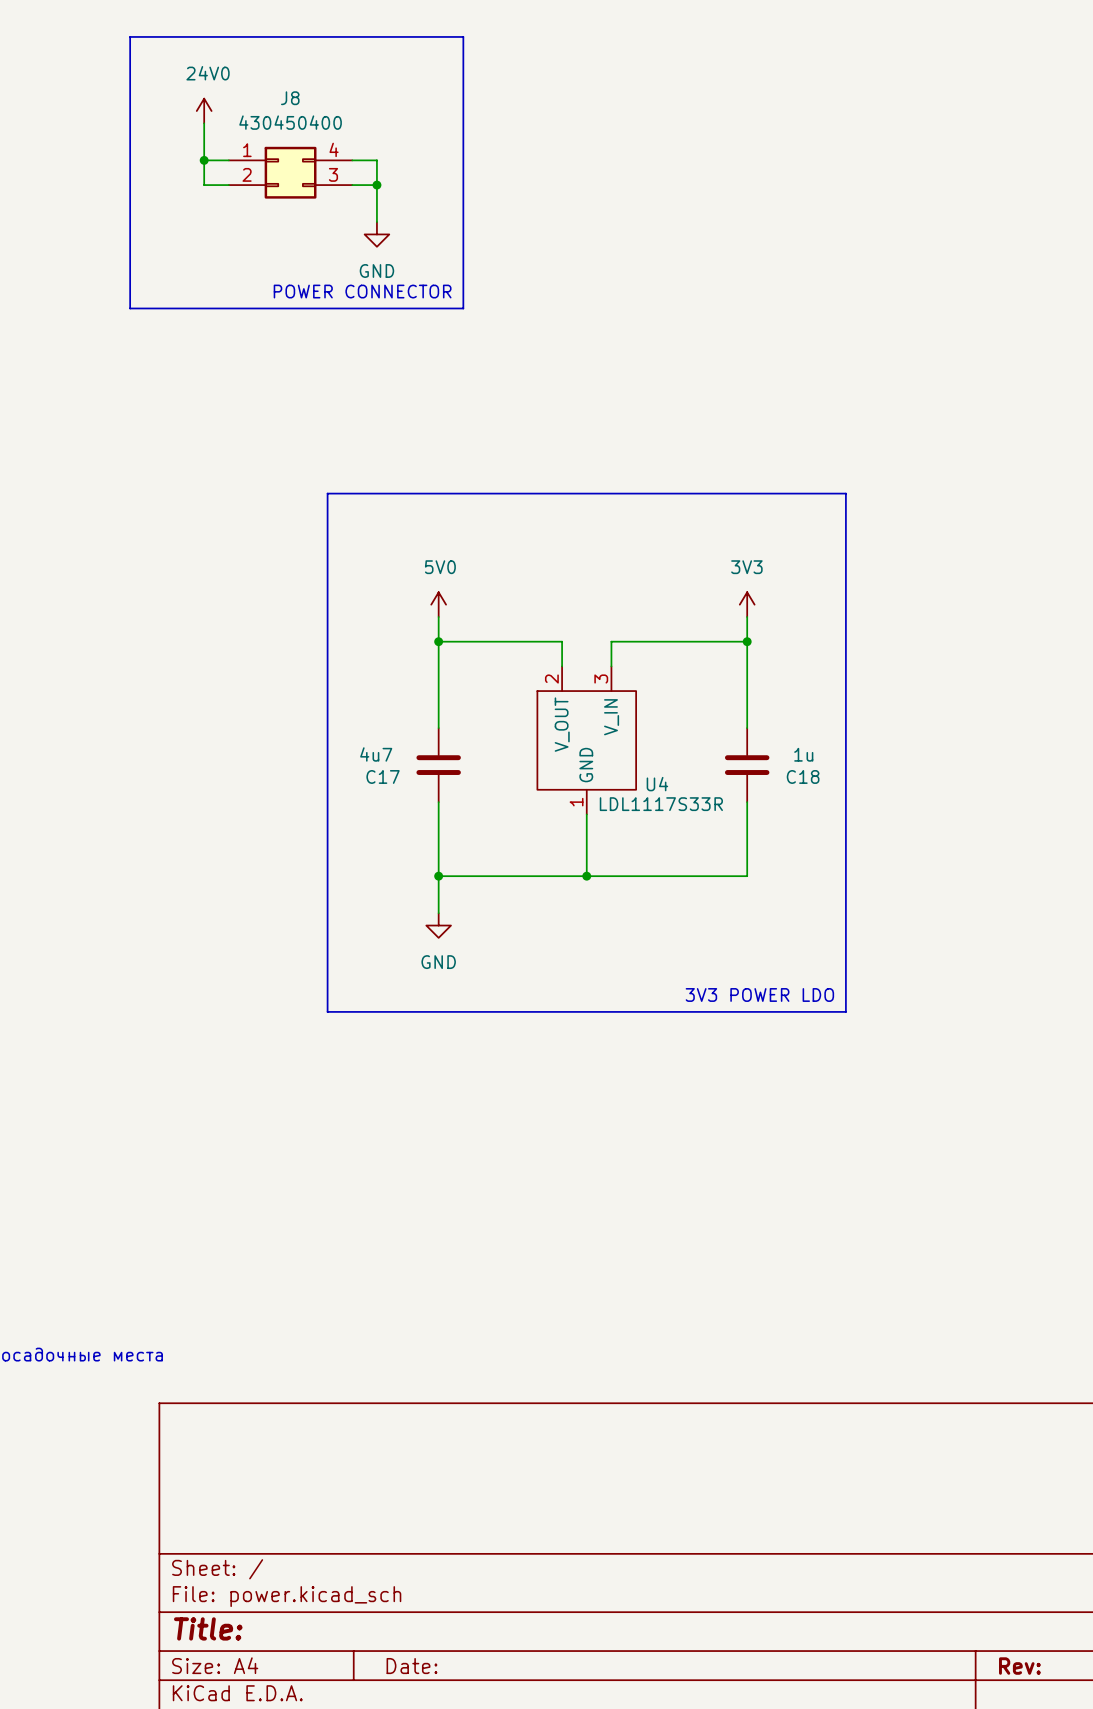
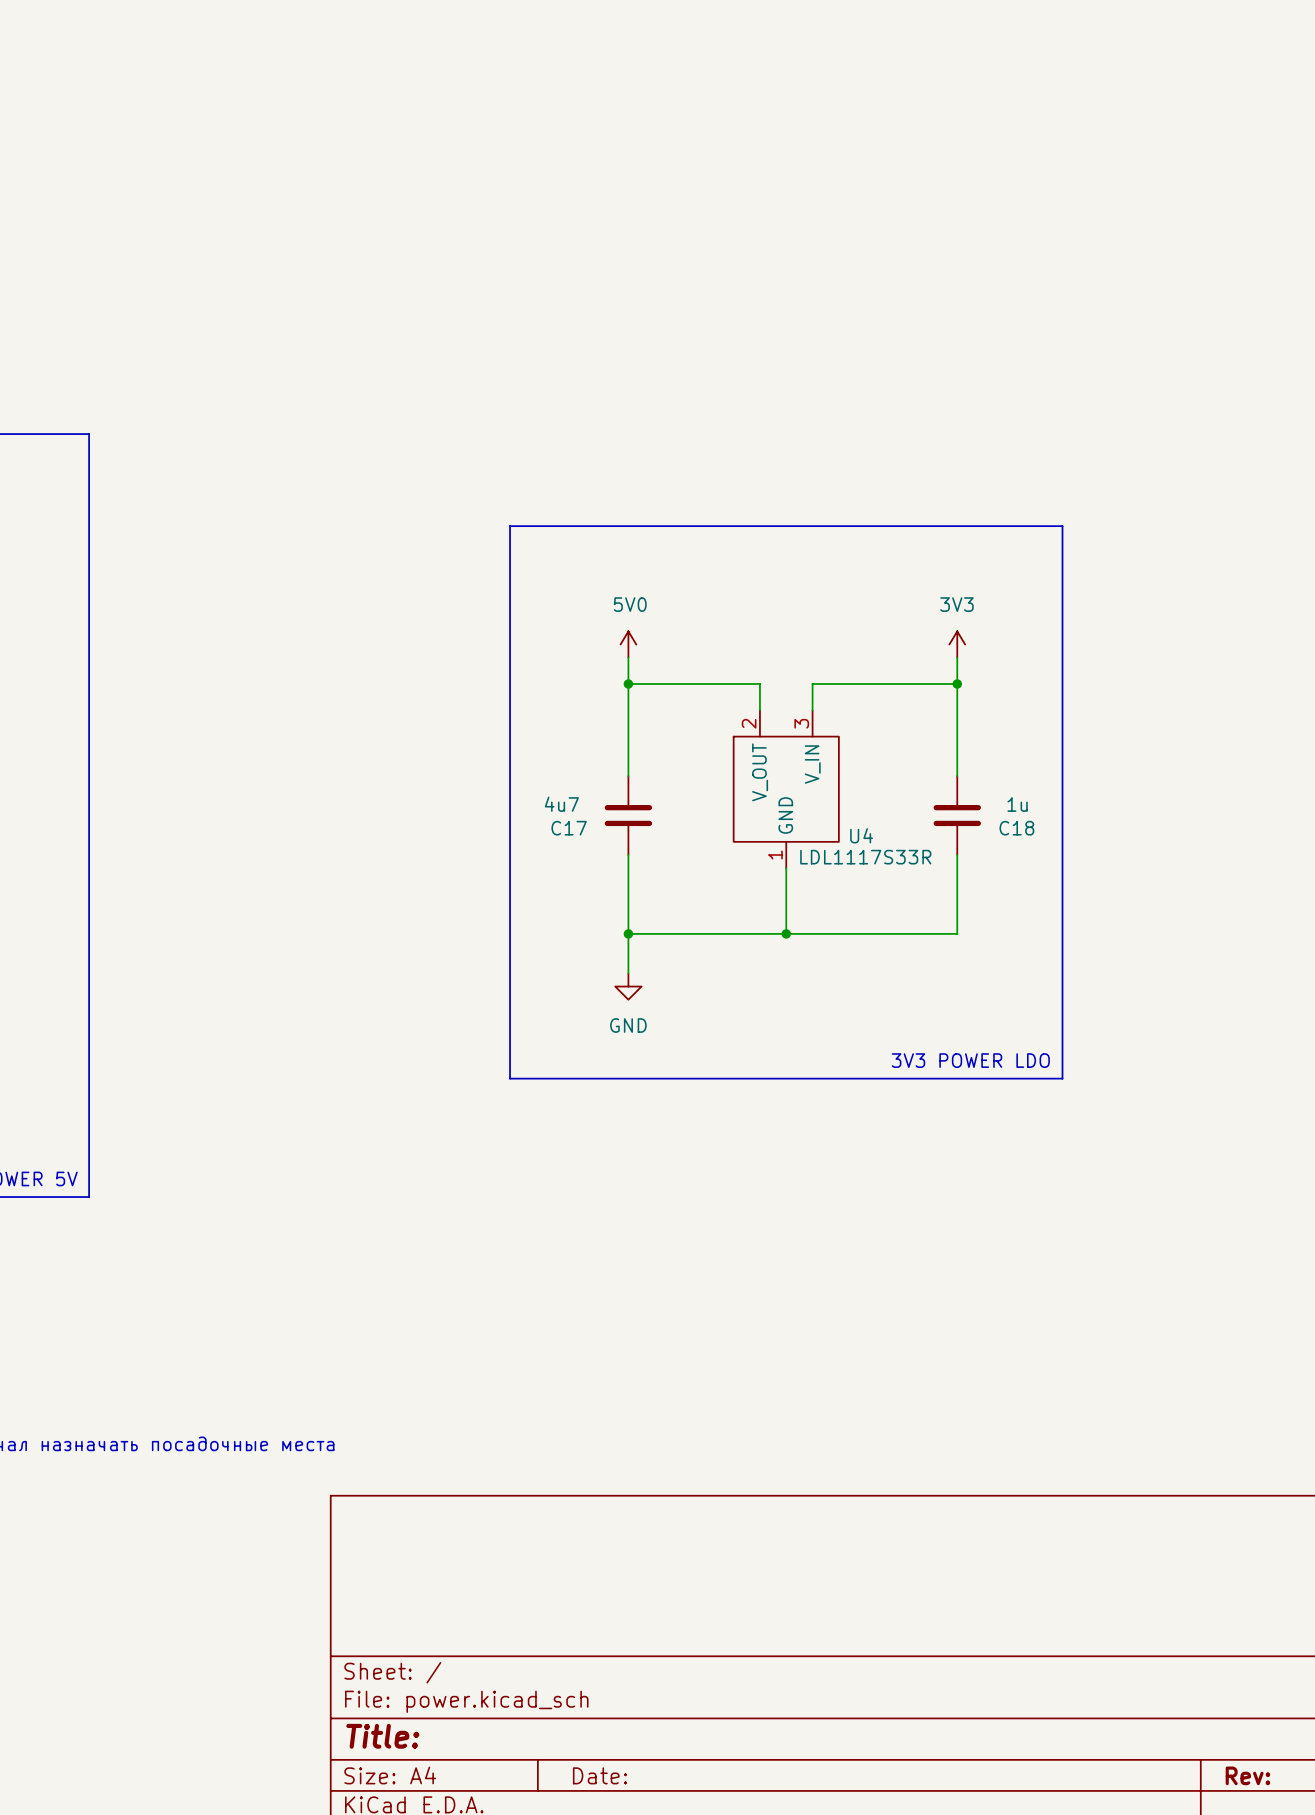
line: (130, 36) (463, 36) (463, 308) (130, 308) (130, 36) -> none
power symbol: 24V0 (204, 111) -> none
wire: (204, 123) (204, 185) (228, 185) -> none
wire: (204, 160) (228, 160) -> none
junction: (204, 160) -> none
wire: (352, 160) (376, 160) (376, 222) -> none
J8: 430450400 (290, 172) -> none
wire: (352, 185) (376, 185) -> none
junction: (376, 185) -> none
power symbol: GND (376, 234) -> none
text: POWER CONNECTOR (362, 291) -> none

